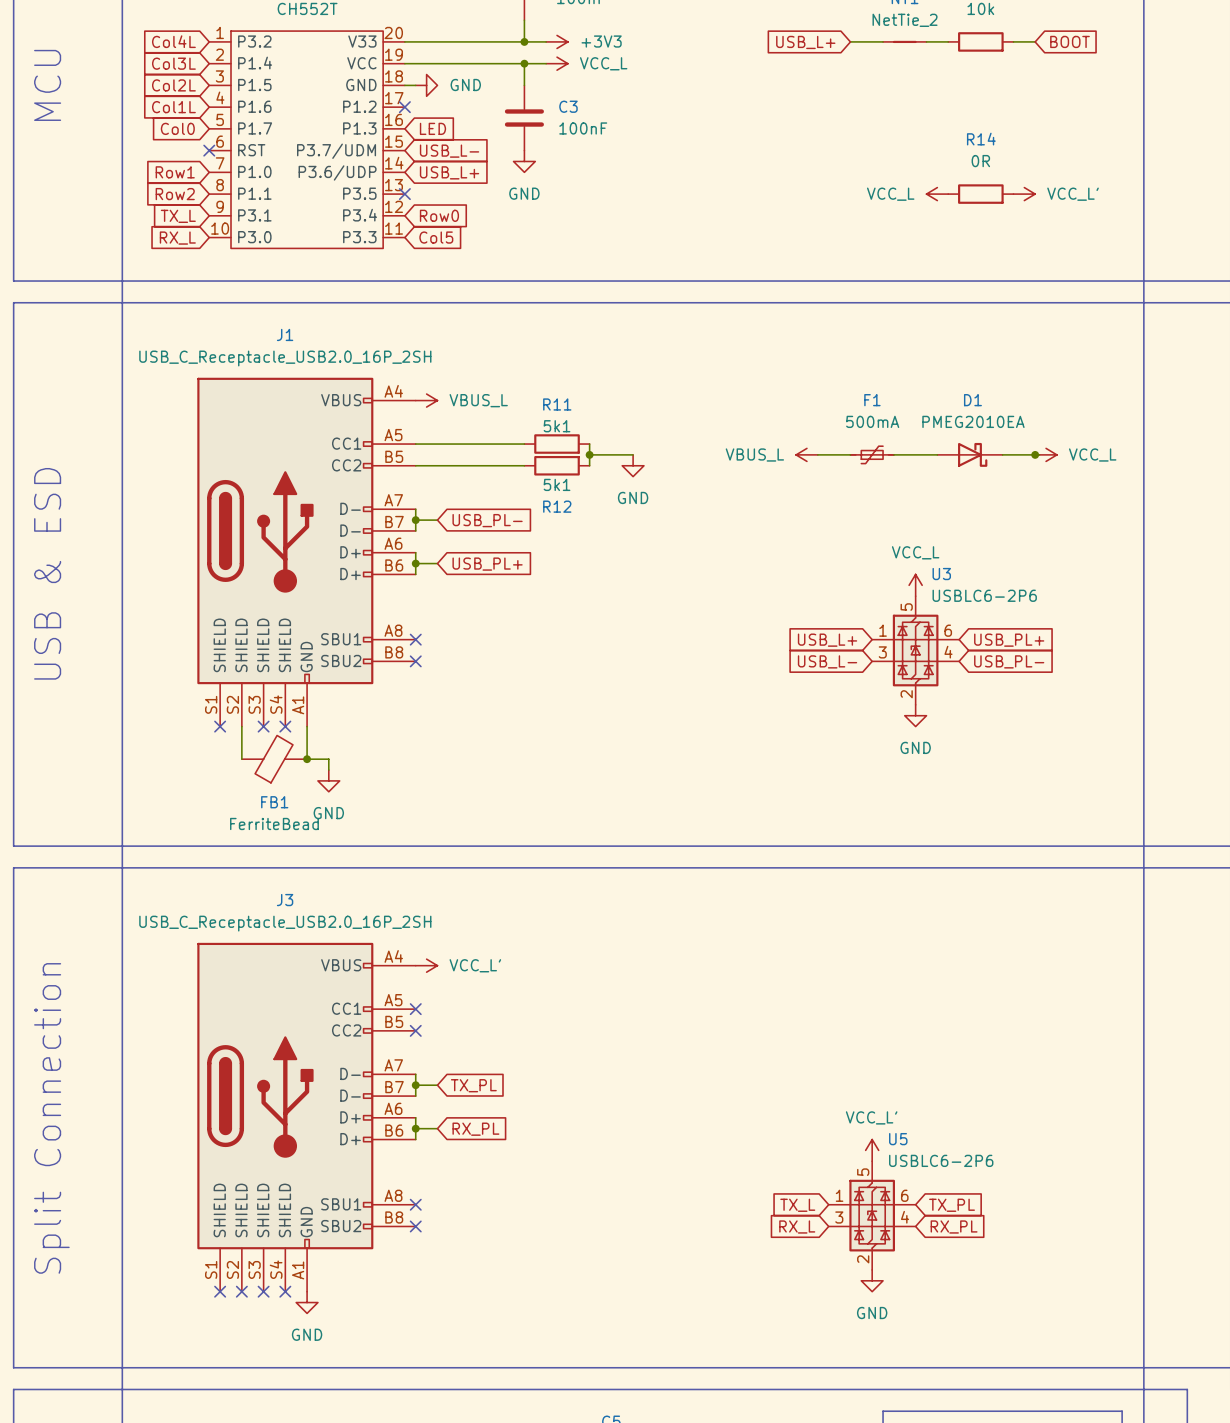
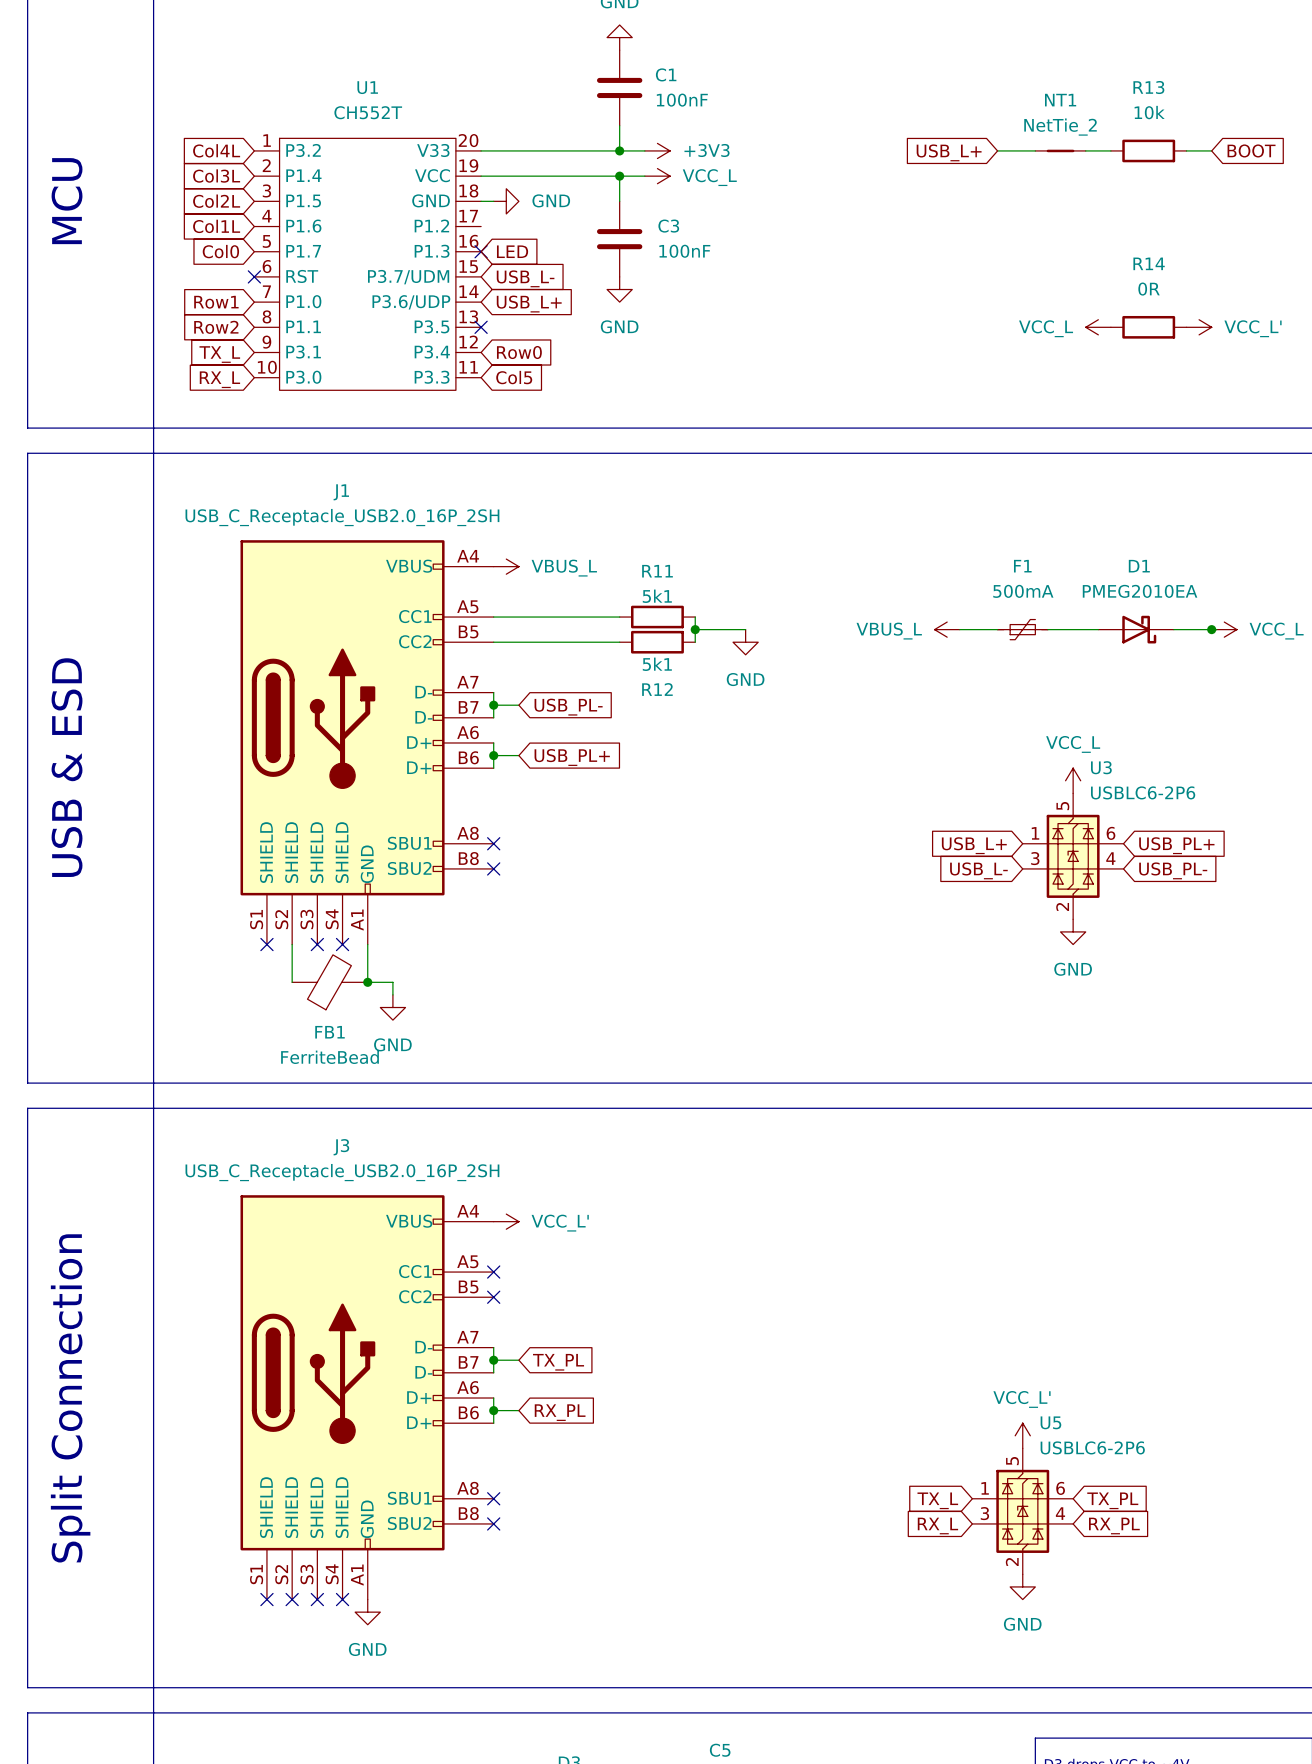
no-connect mark position: (404, 107) -> (481, 251)

